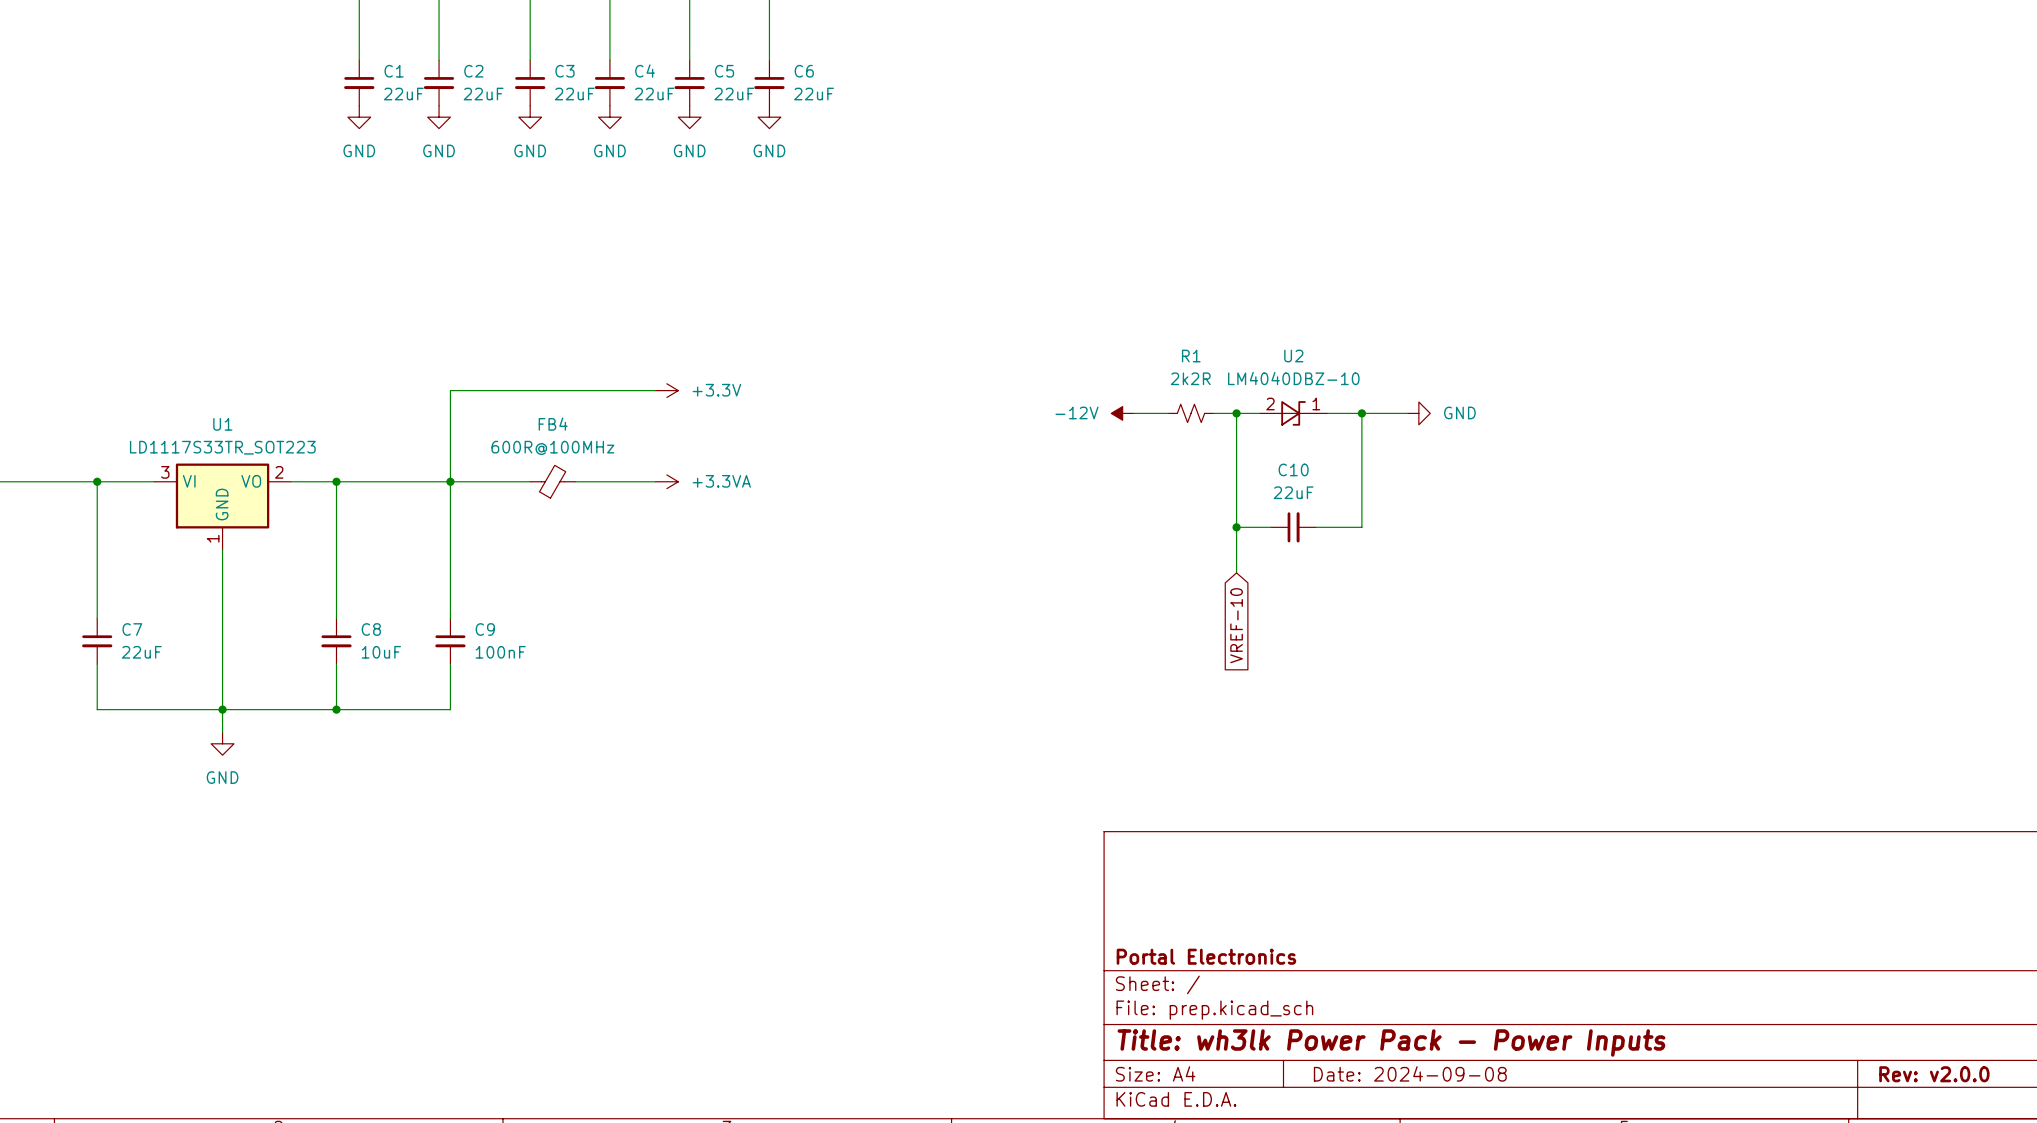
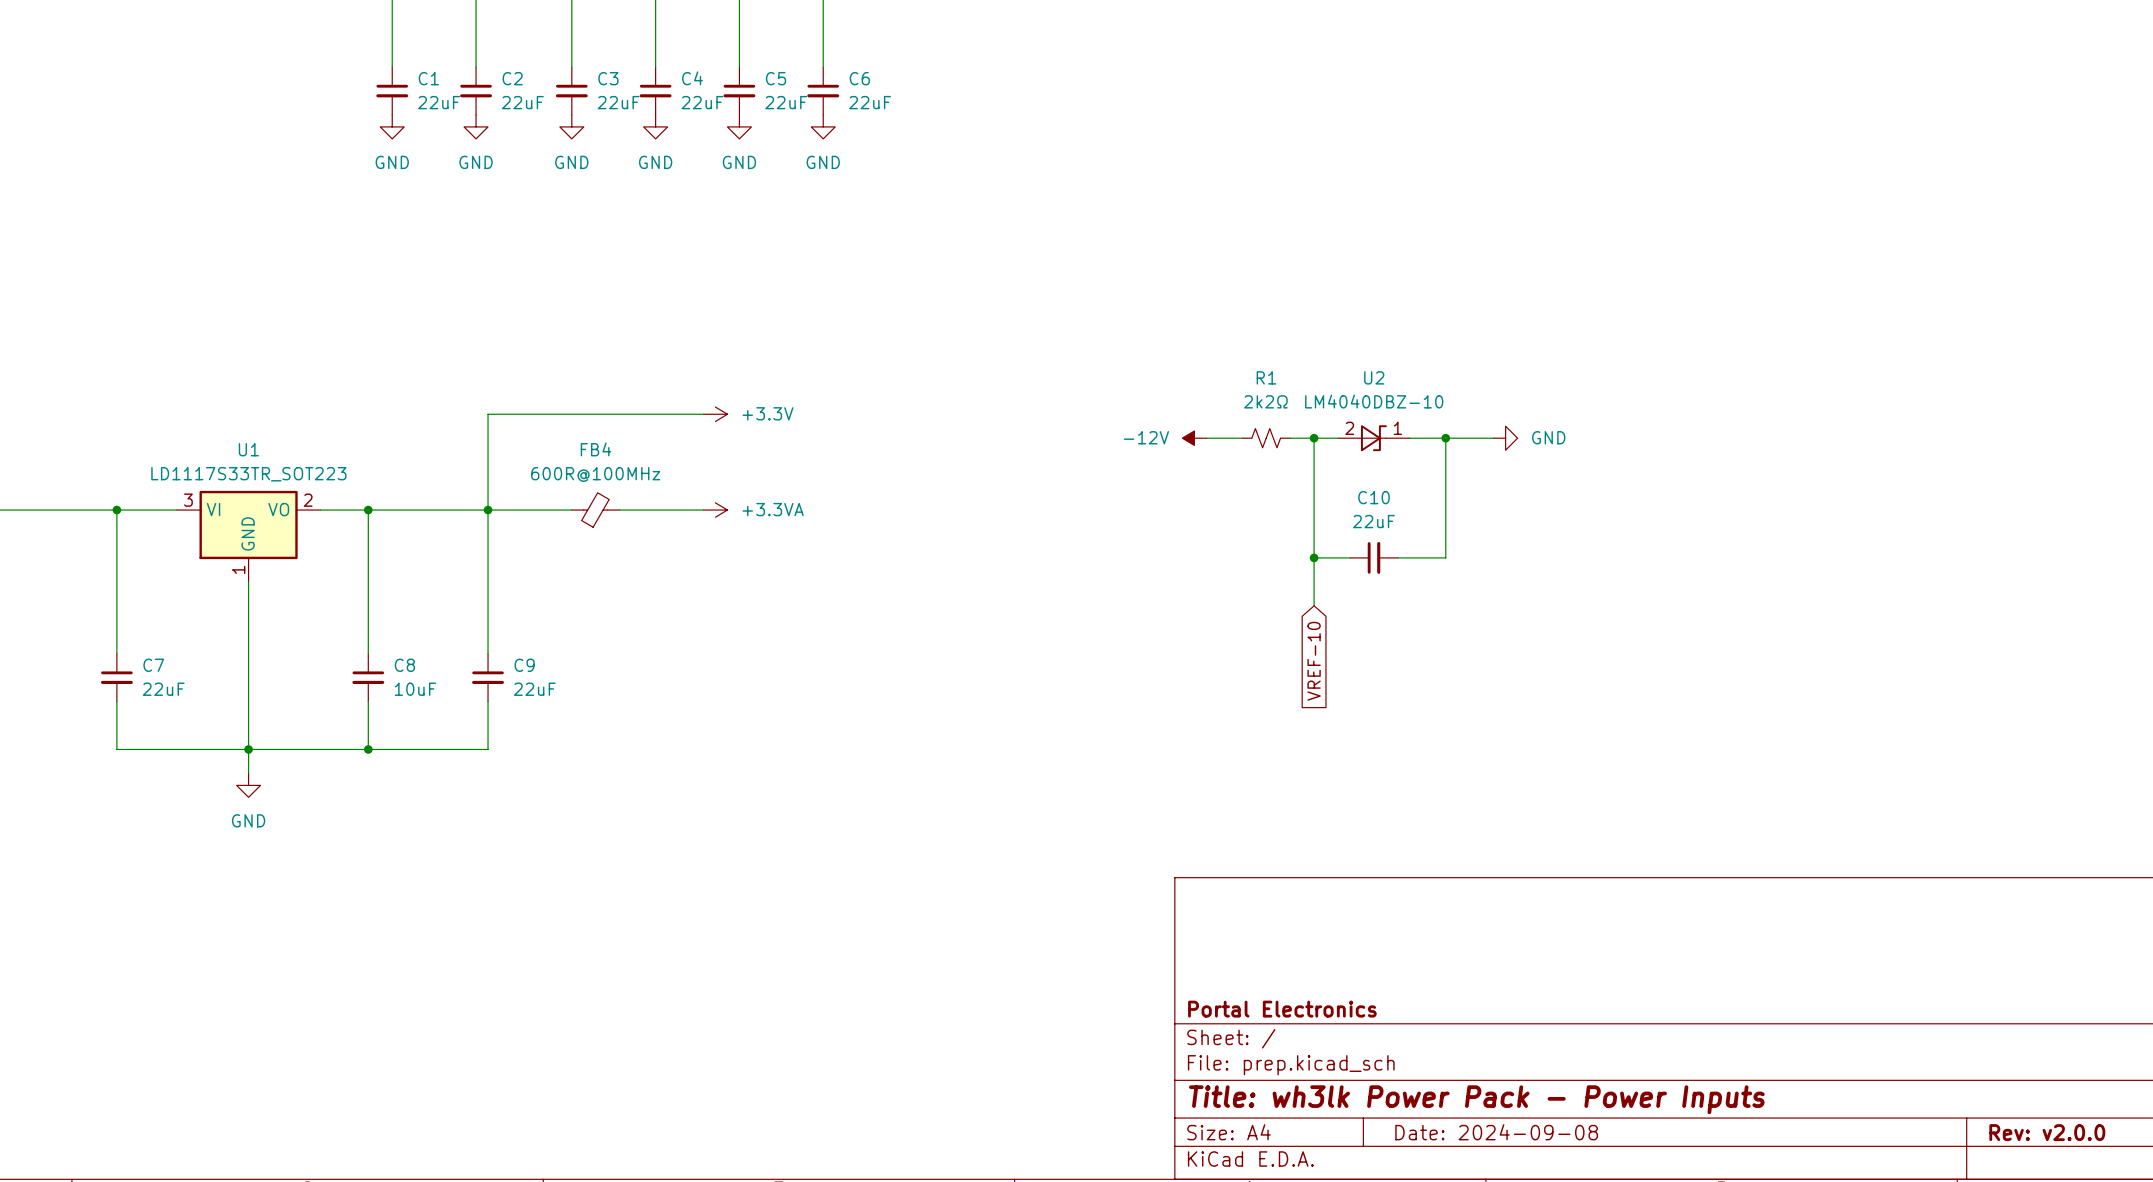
R1 value: 2k2R (1190, 378) -> 2k2Ω (1265, 401)
C9 value: 100nF (500, 652) -> 22uF (534, 689)

